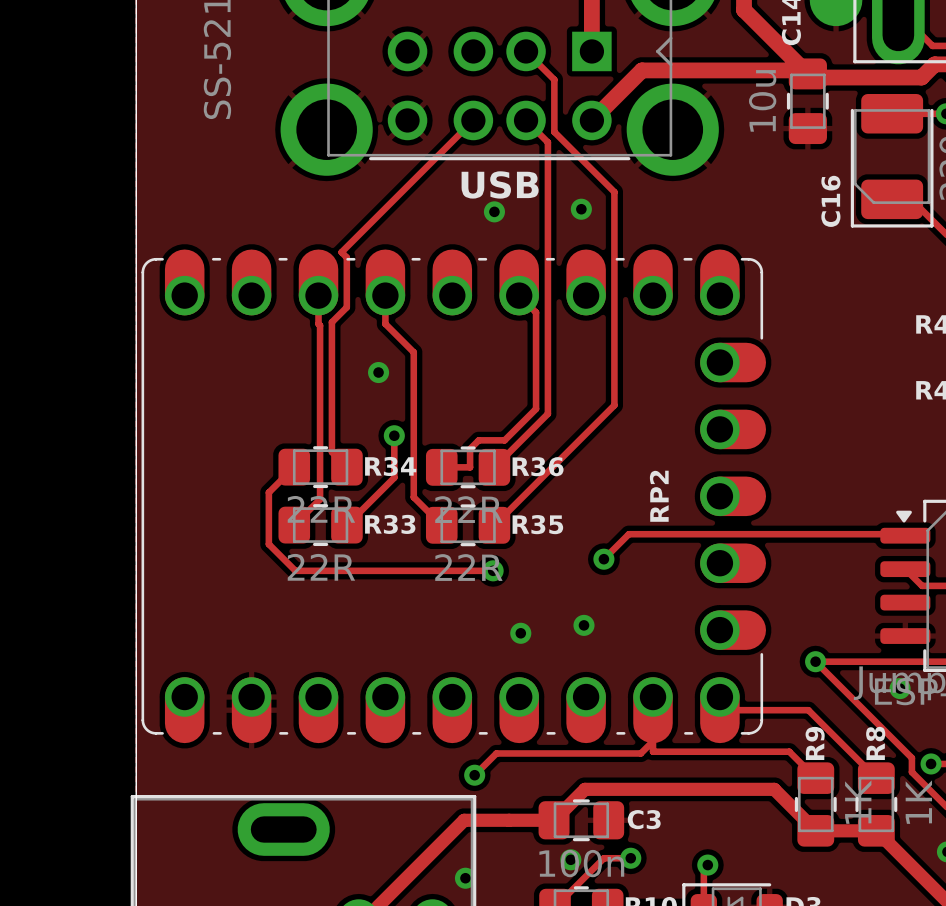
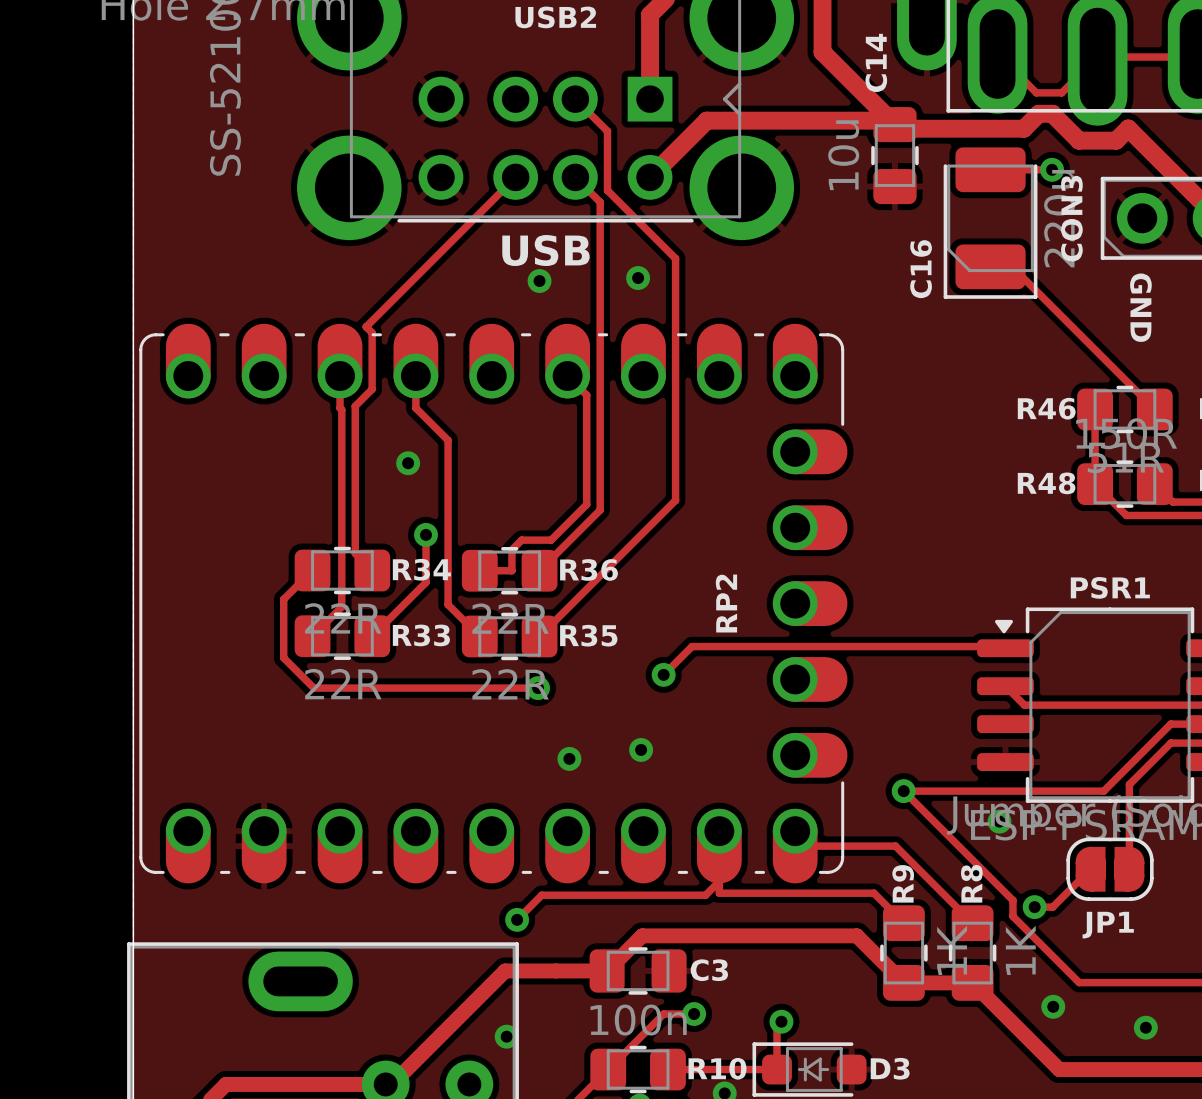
via: (570, 859) -> none

